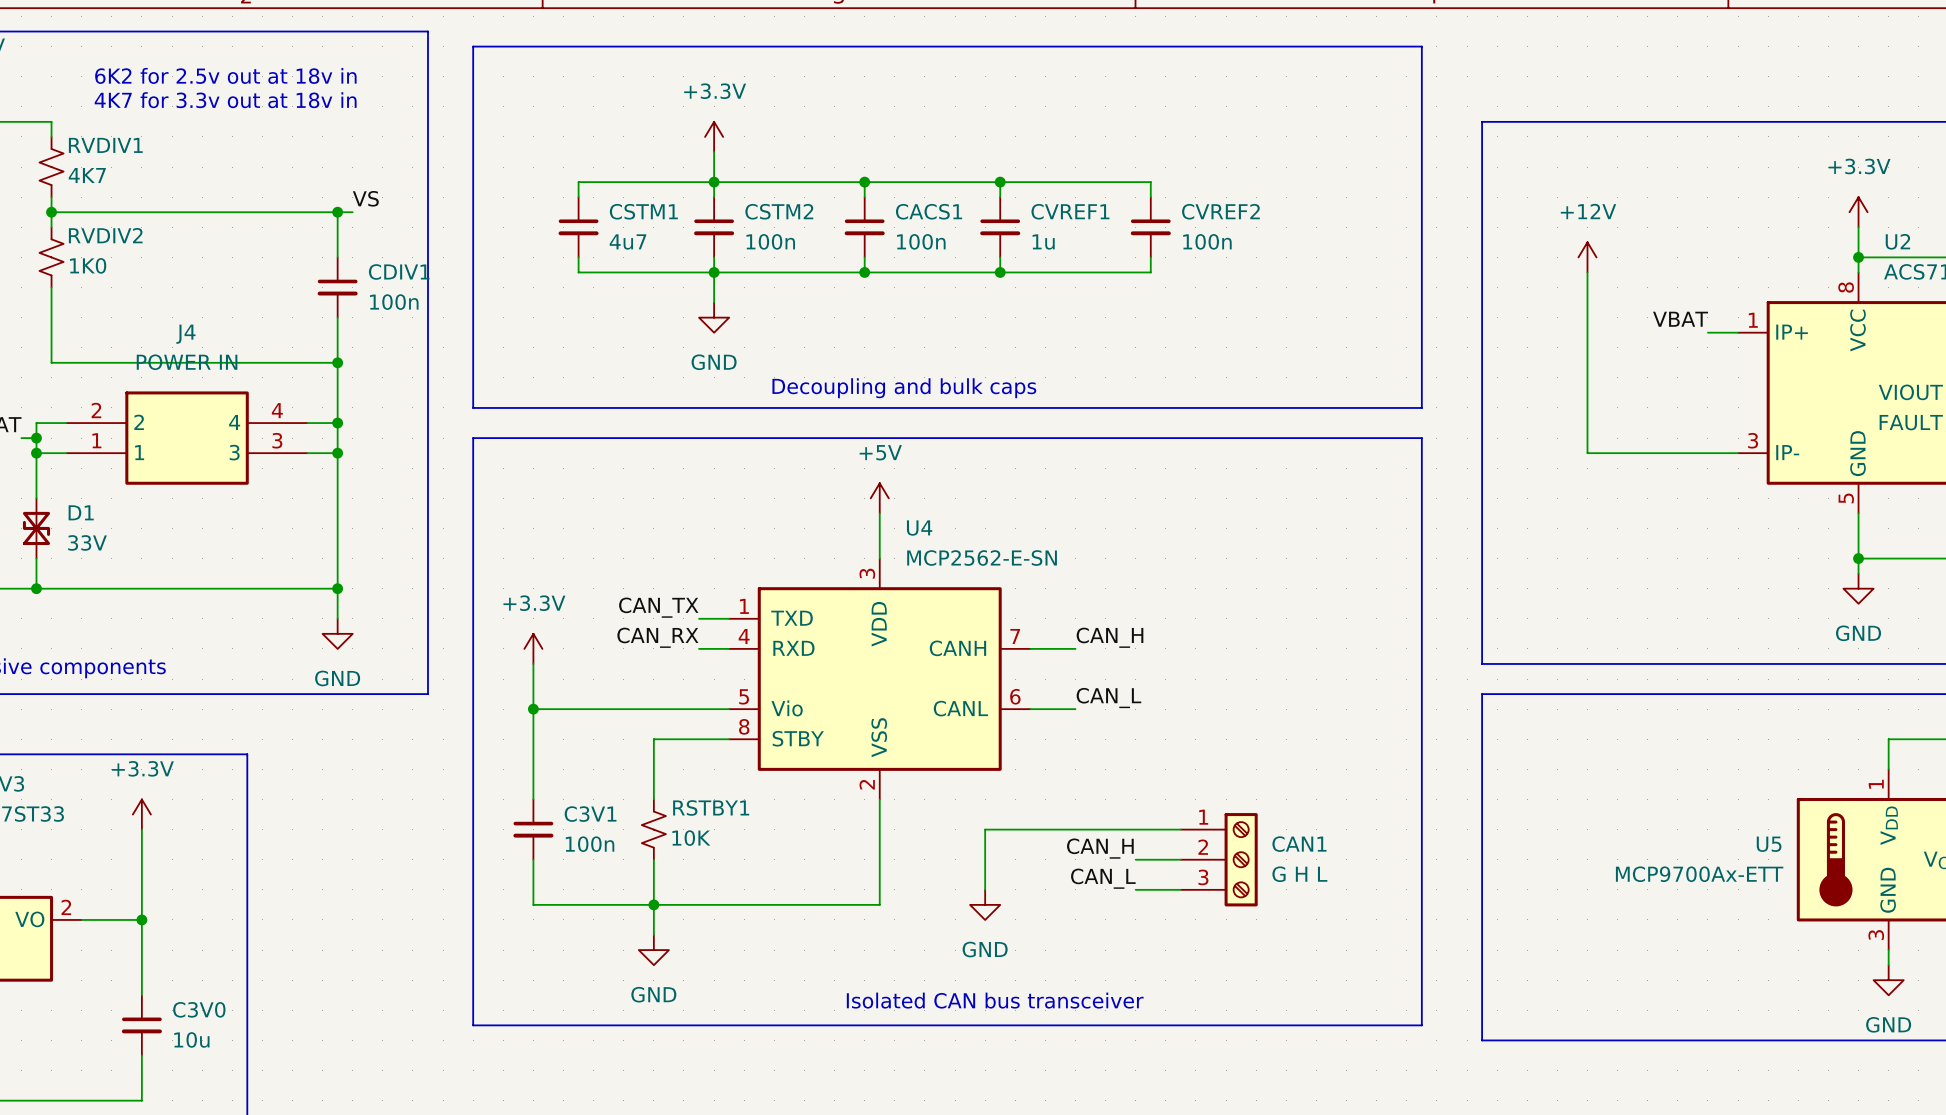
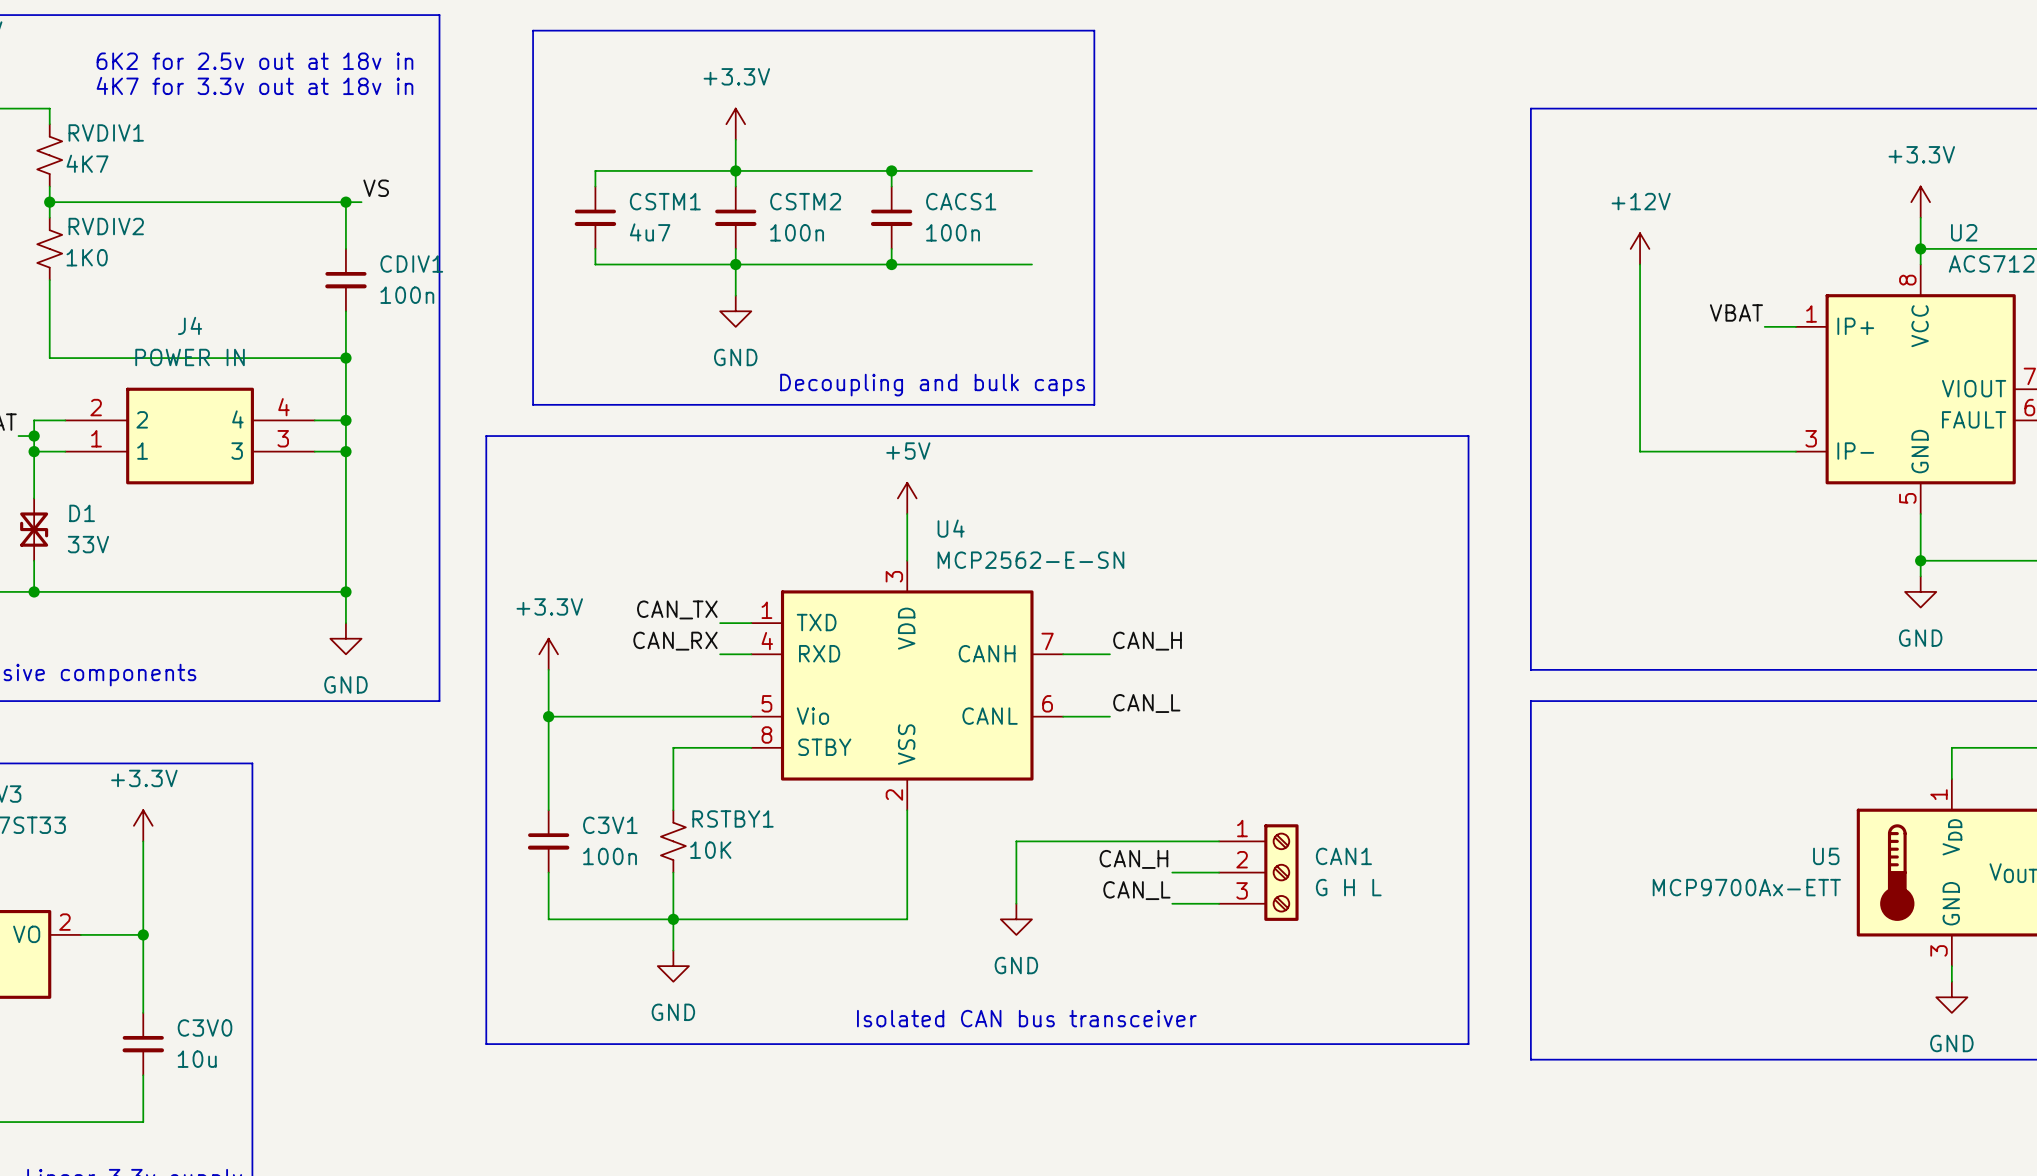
line: (518, 46) (473, 46) (473, 407) (518, 407) -> (533, 30) (533, 404)
line: (1060, 46) (1421, 46) (1421, 407) (1060, 407) -> (1094, 30) (1094, 404)
junction: (1000, 182) -> none
wire: (1000, 197) (1000, 182) (1150, 182) (1150, 197) -> none
CVREF1: 1u (1000, 227) -> none
CVREF2: 100n (1150, 227) -> none
wire: (1000, 257) (1000, 272) (1150, 272) (1150, 257) -> none
junction: (1000, 272) -> none

